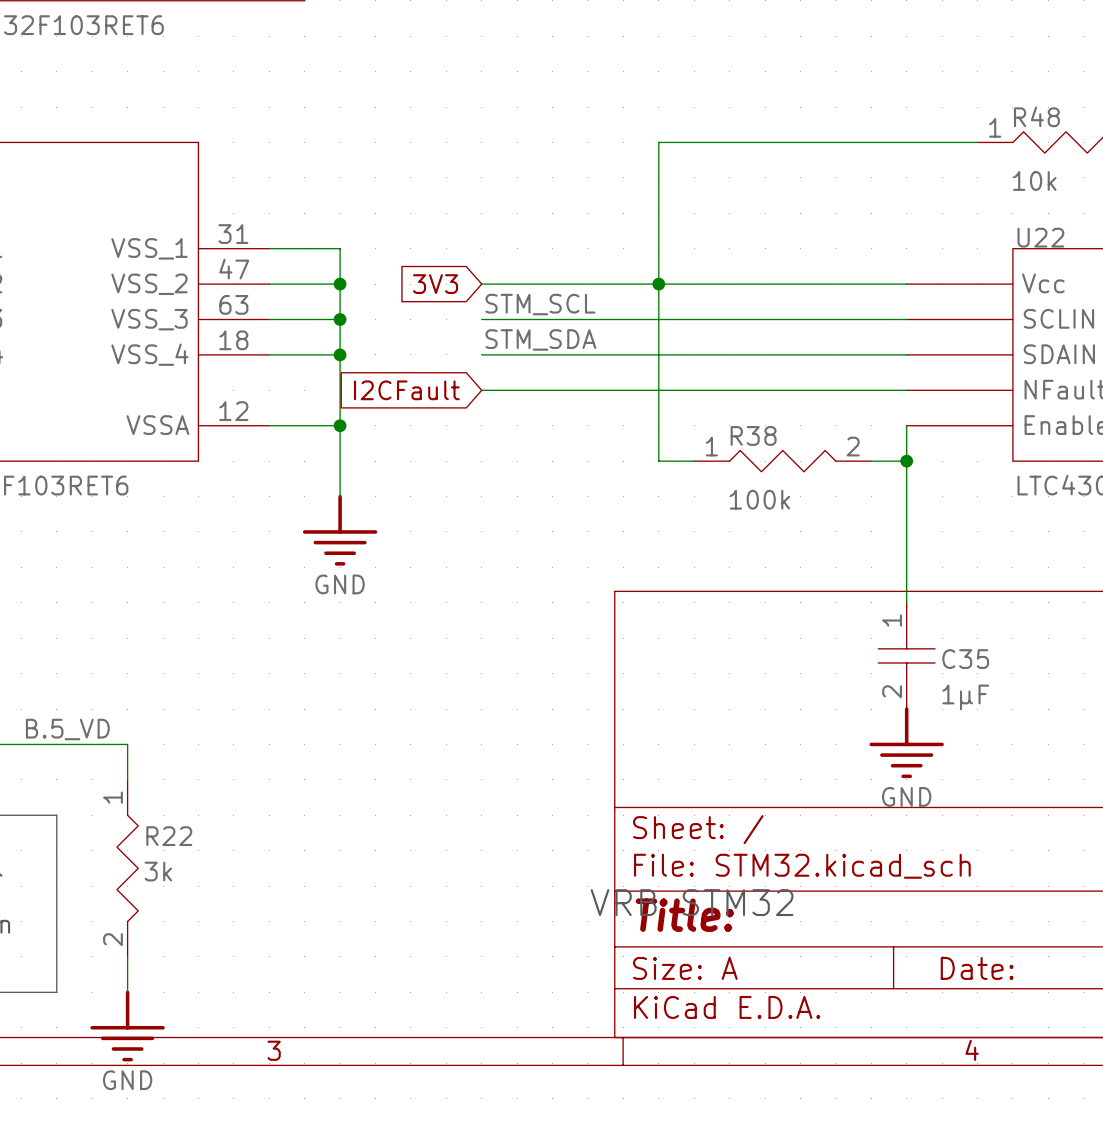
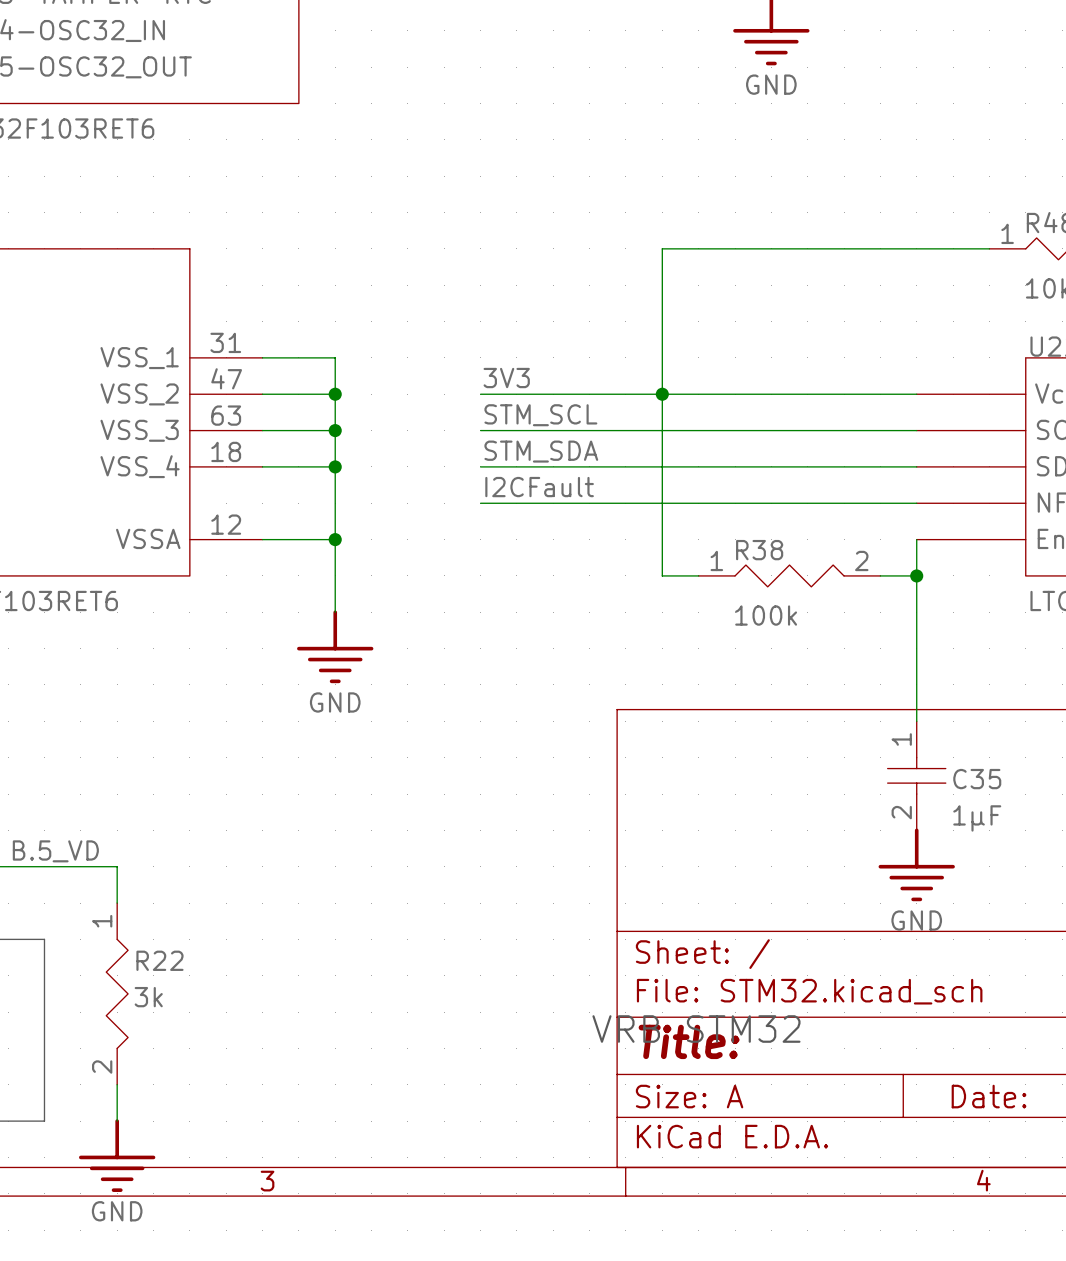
label: none -> 3V3 (506, 378)
global label: 3V3 (435, 284) -> none
label: none -> I2CFault (539, 487)
global label: I2CFault (406, 390) -> none

